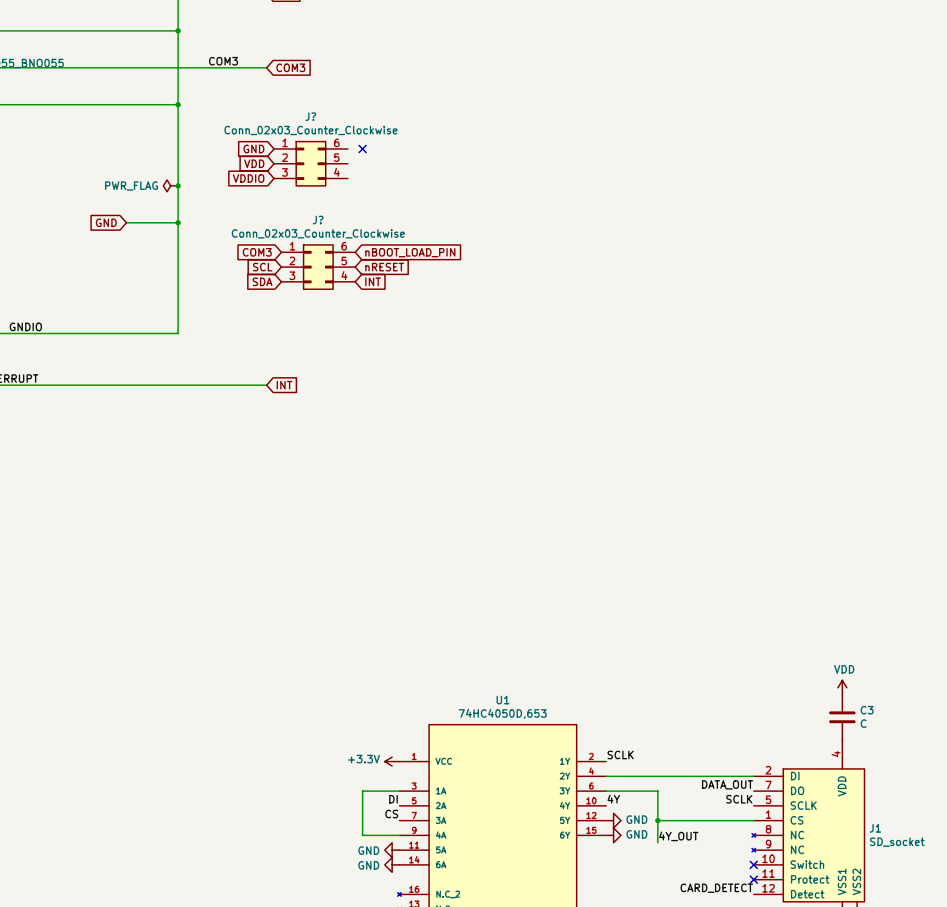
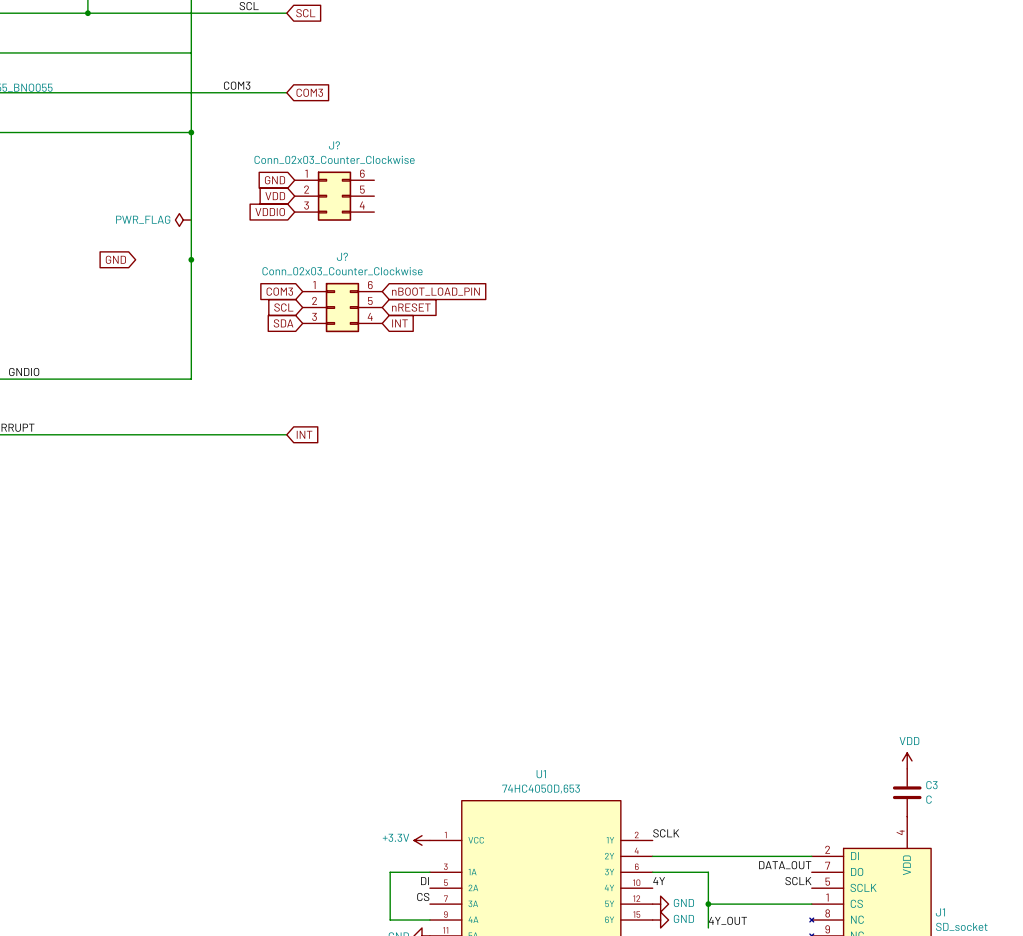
junction: (178, 30) -> none
no-connect mark: (362, 148) -> none
junction: (178, 185) -> none
wire: (126, 222) (178, 222) -> none

